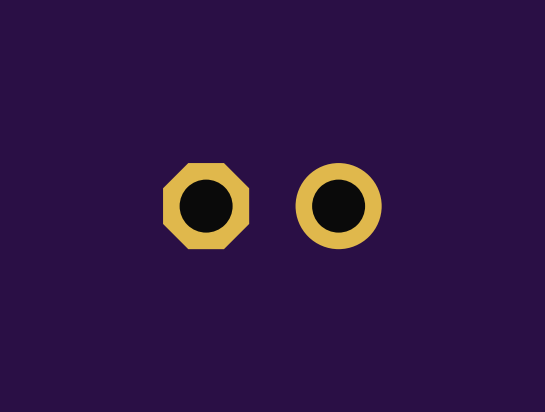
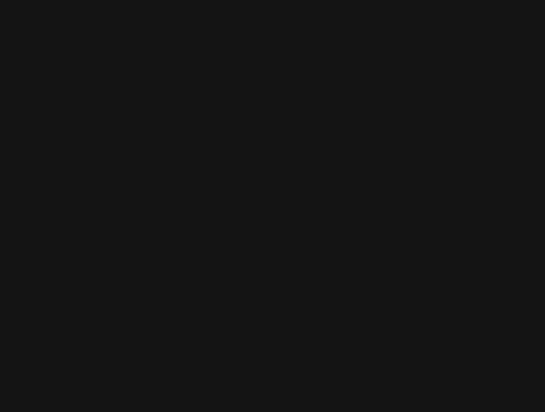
part: (272, 206) -> none

